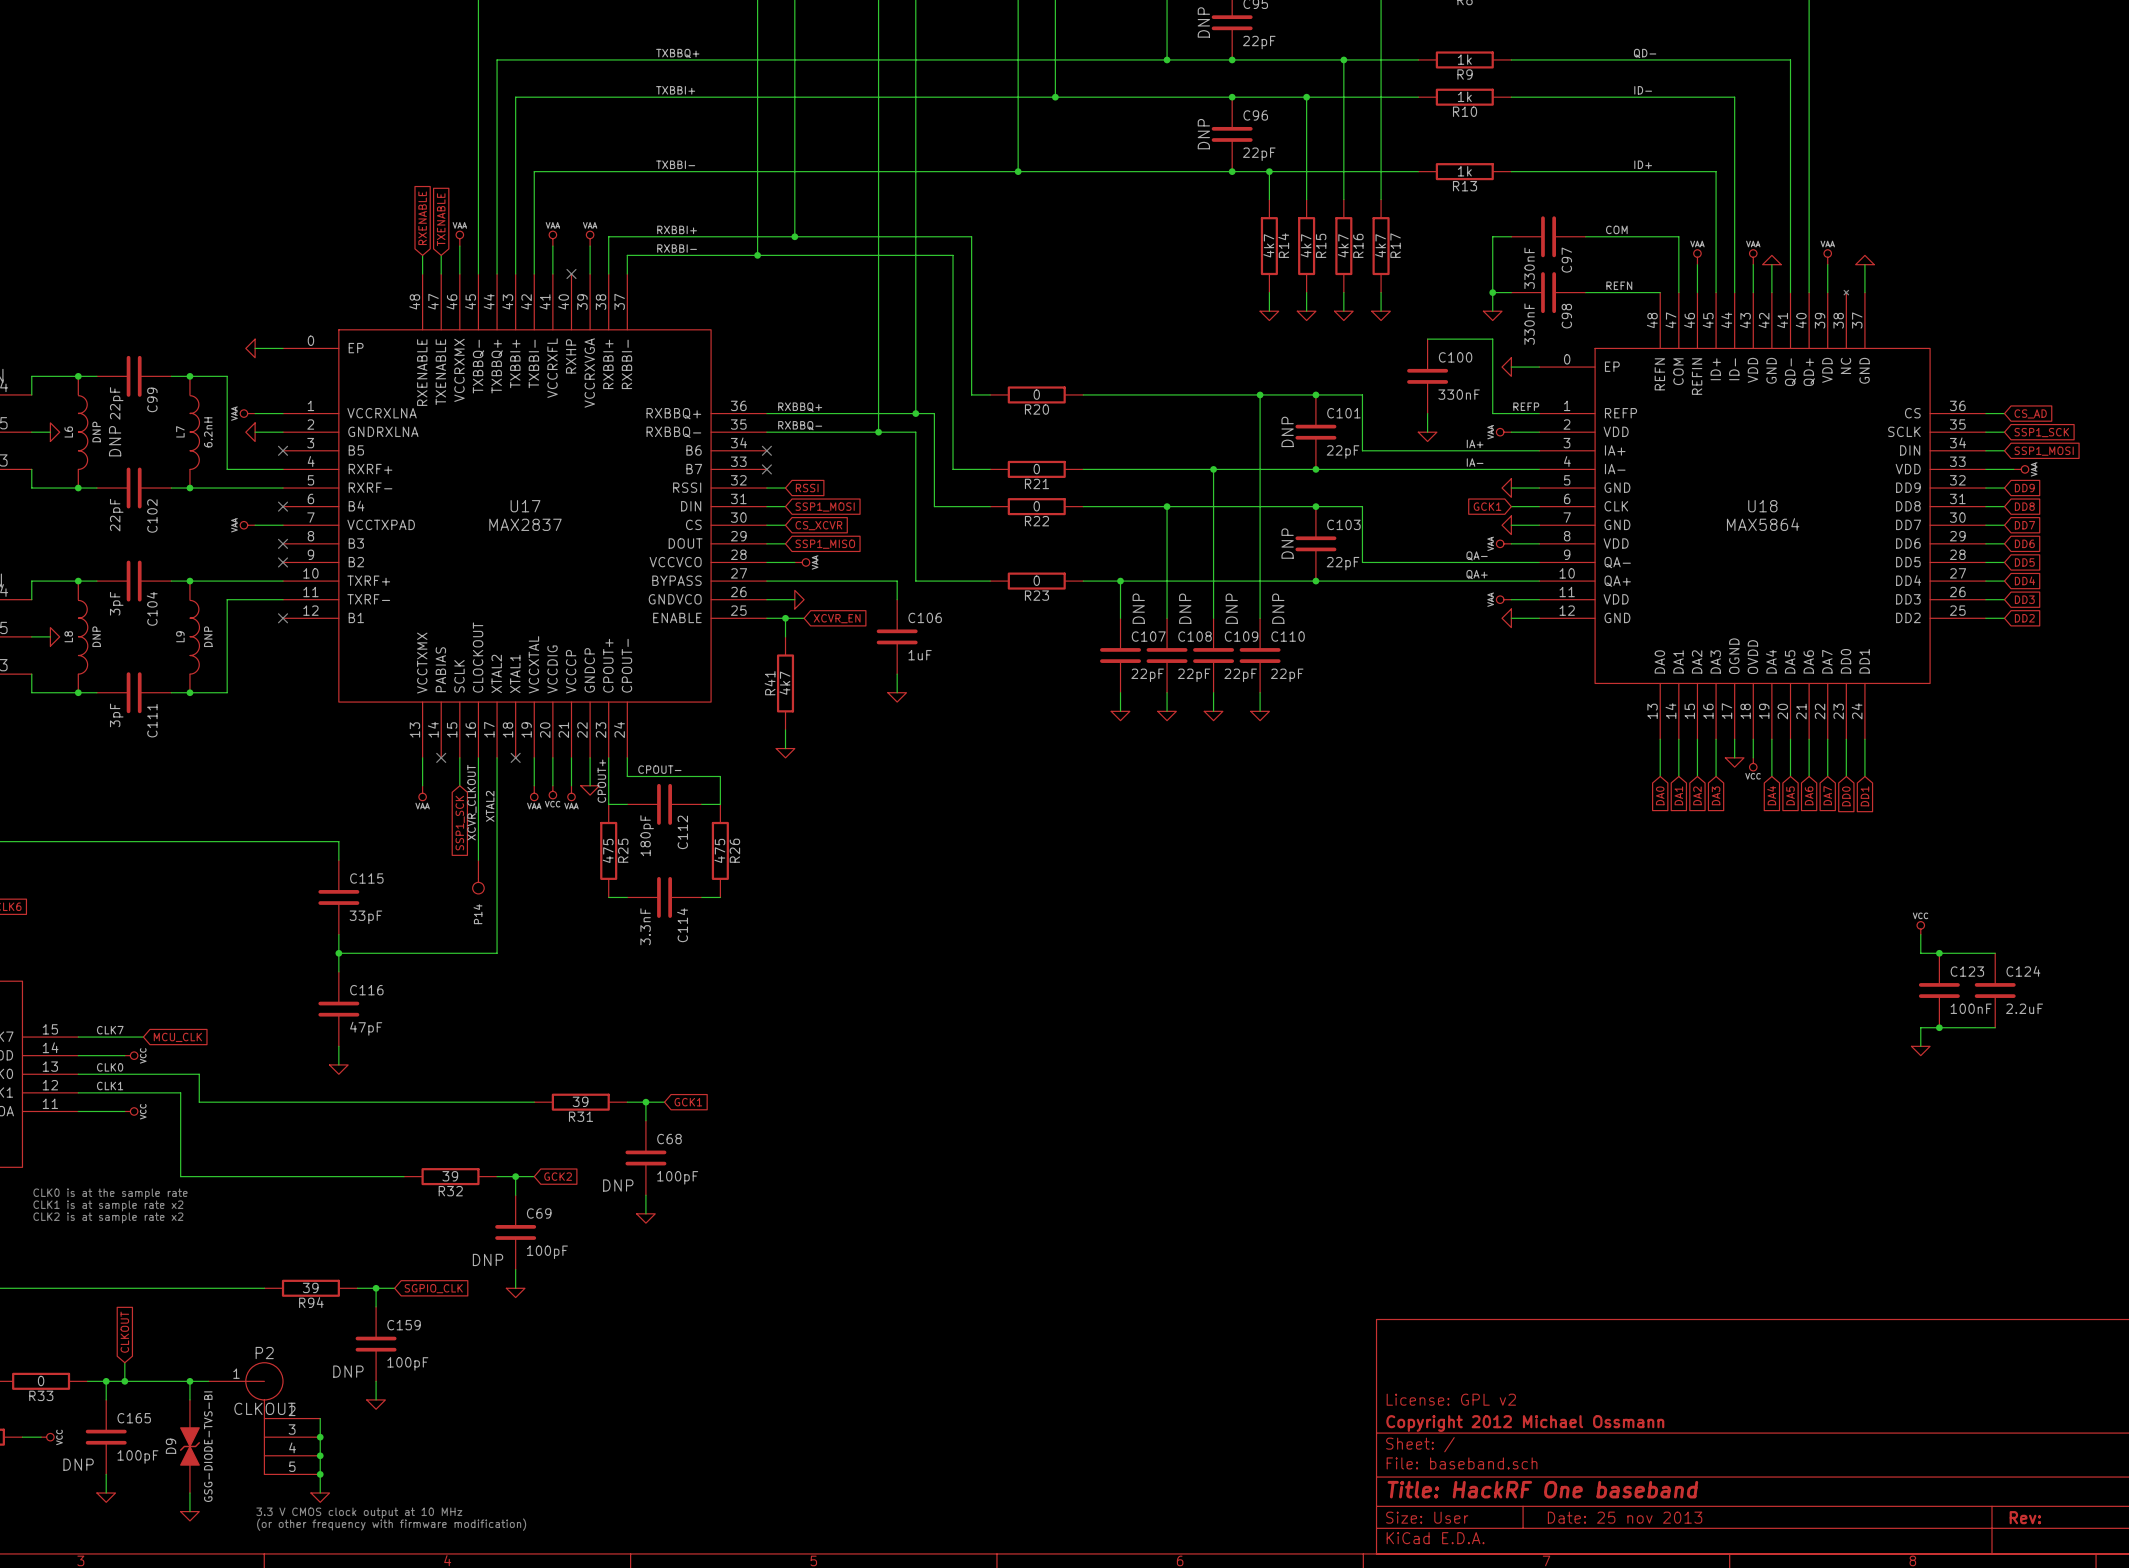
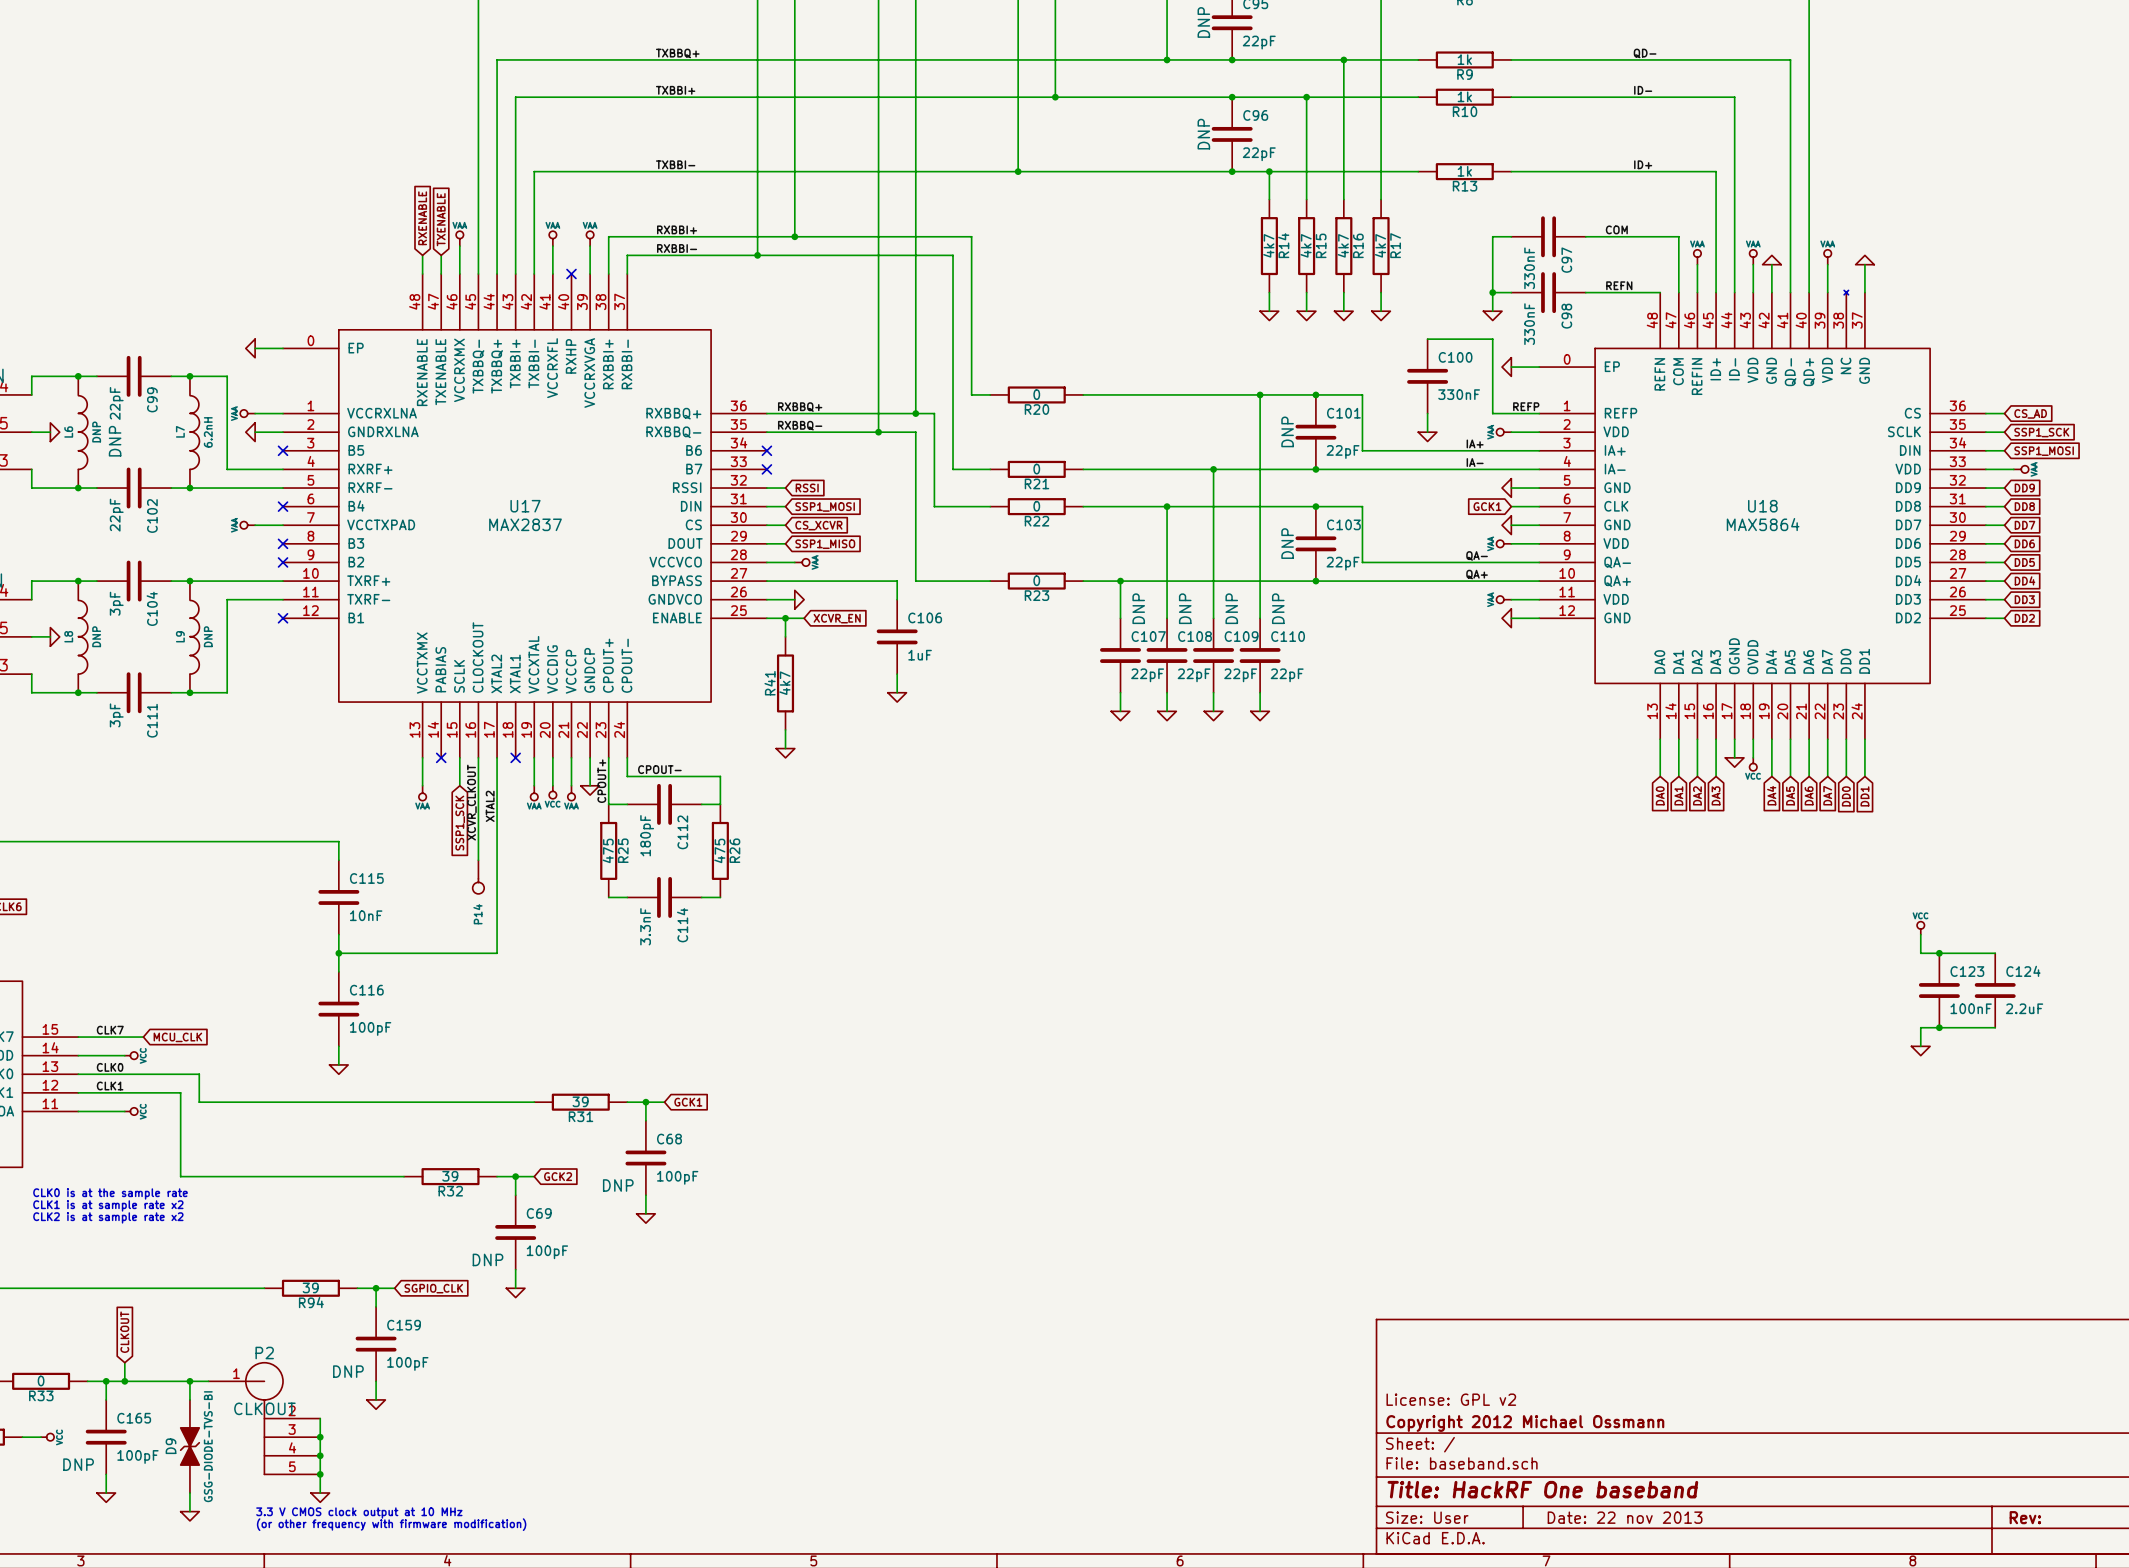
C115 value: 33pF (365, 917) -> 10nF (366, 915)
C116 value: 47pF (366, 1028) -> 100pF (370, 1028)
title block: Date: 25 nov 2013 (1625, 1517) -> Date: 22 nov 2013 (1625, 1517)

